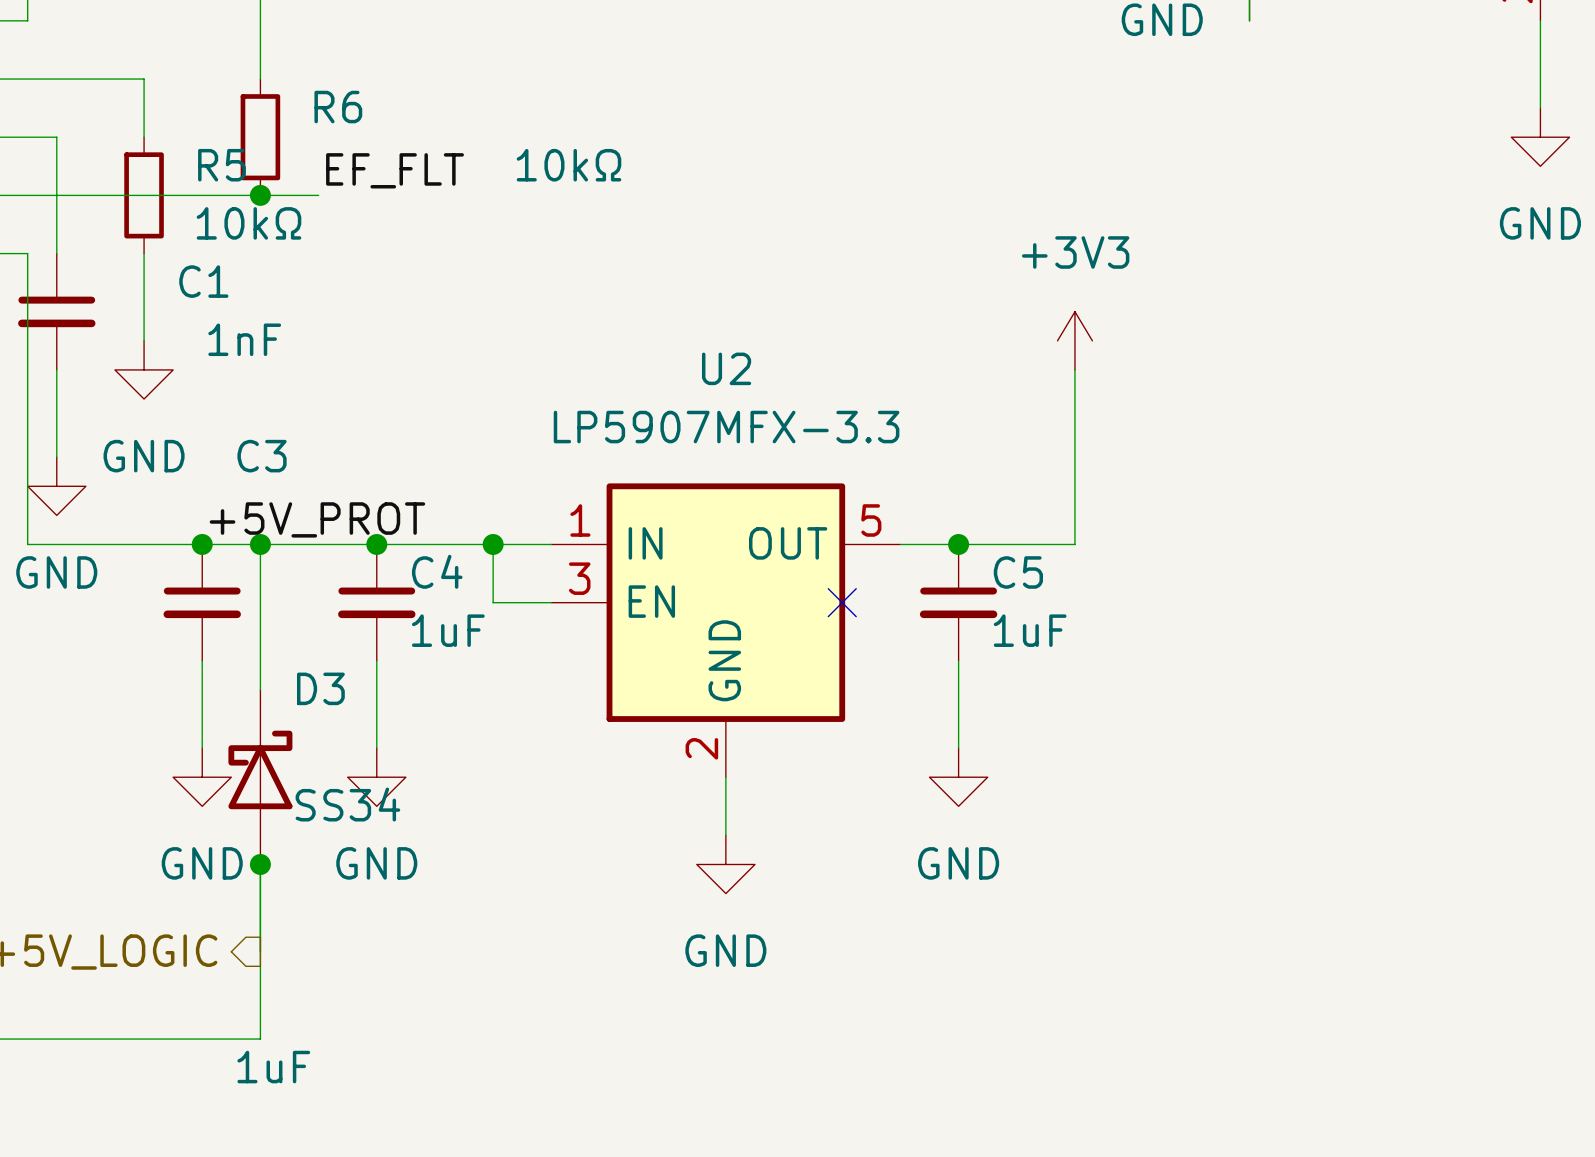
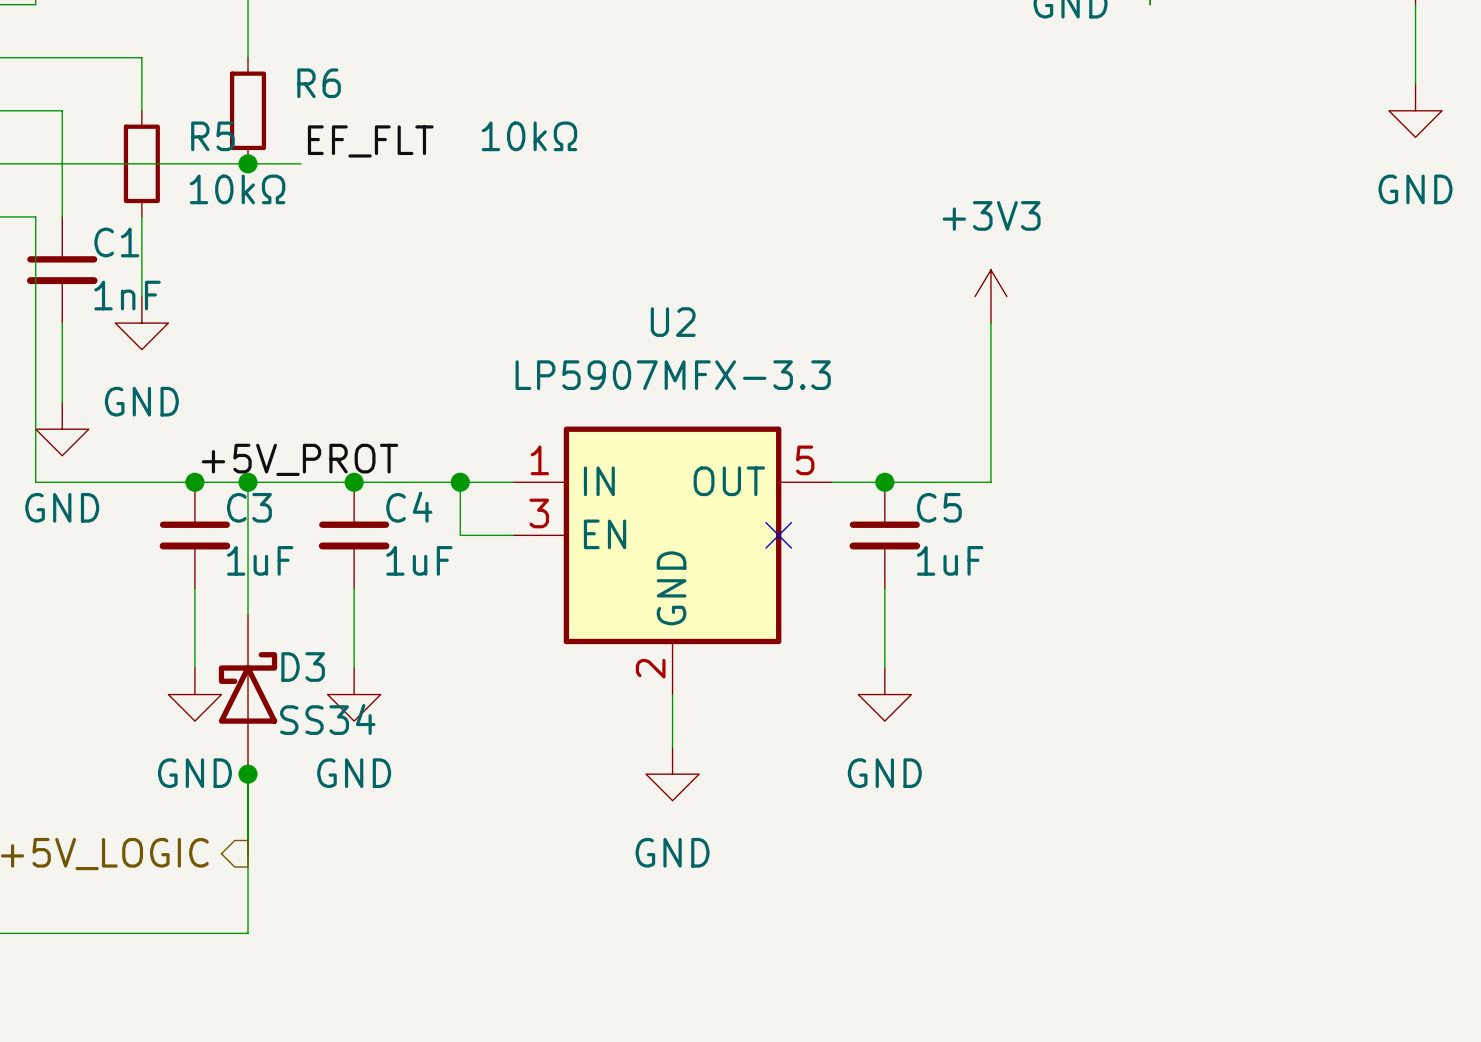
C1 name position: C1 (203, 281) -> C1 (116, 242)
C1 value position: 1nF (244, 339) -> 1nF (127, 295)
C3 name position: C3 (262, 456) -> C3 (249, 507)
D3 name position: D3 (320, 688) -> D3 (303, 667)
C3 value position: 1uF (273, 1067) -> 1uF (260, 560)

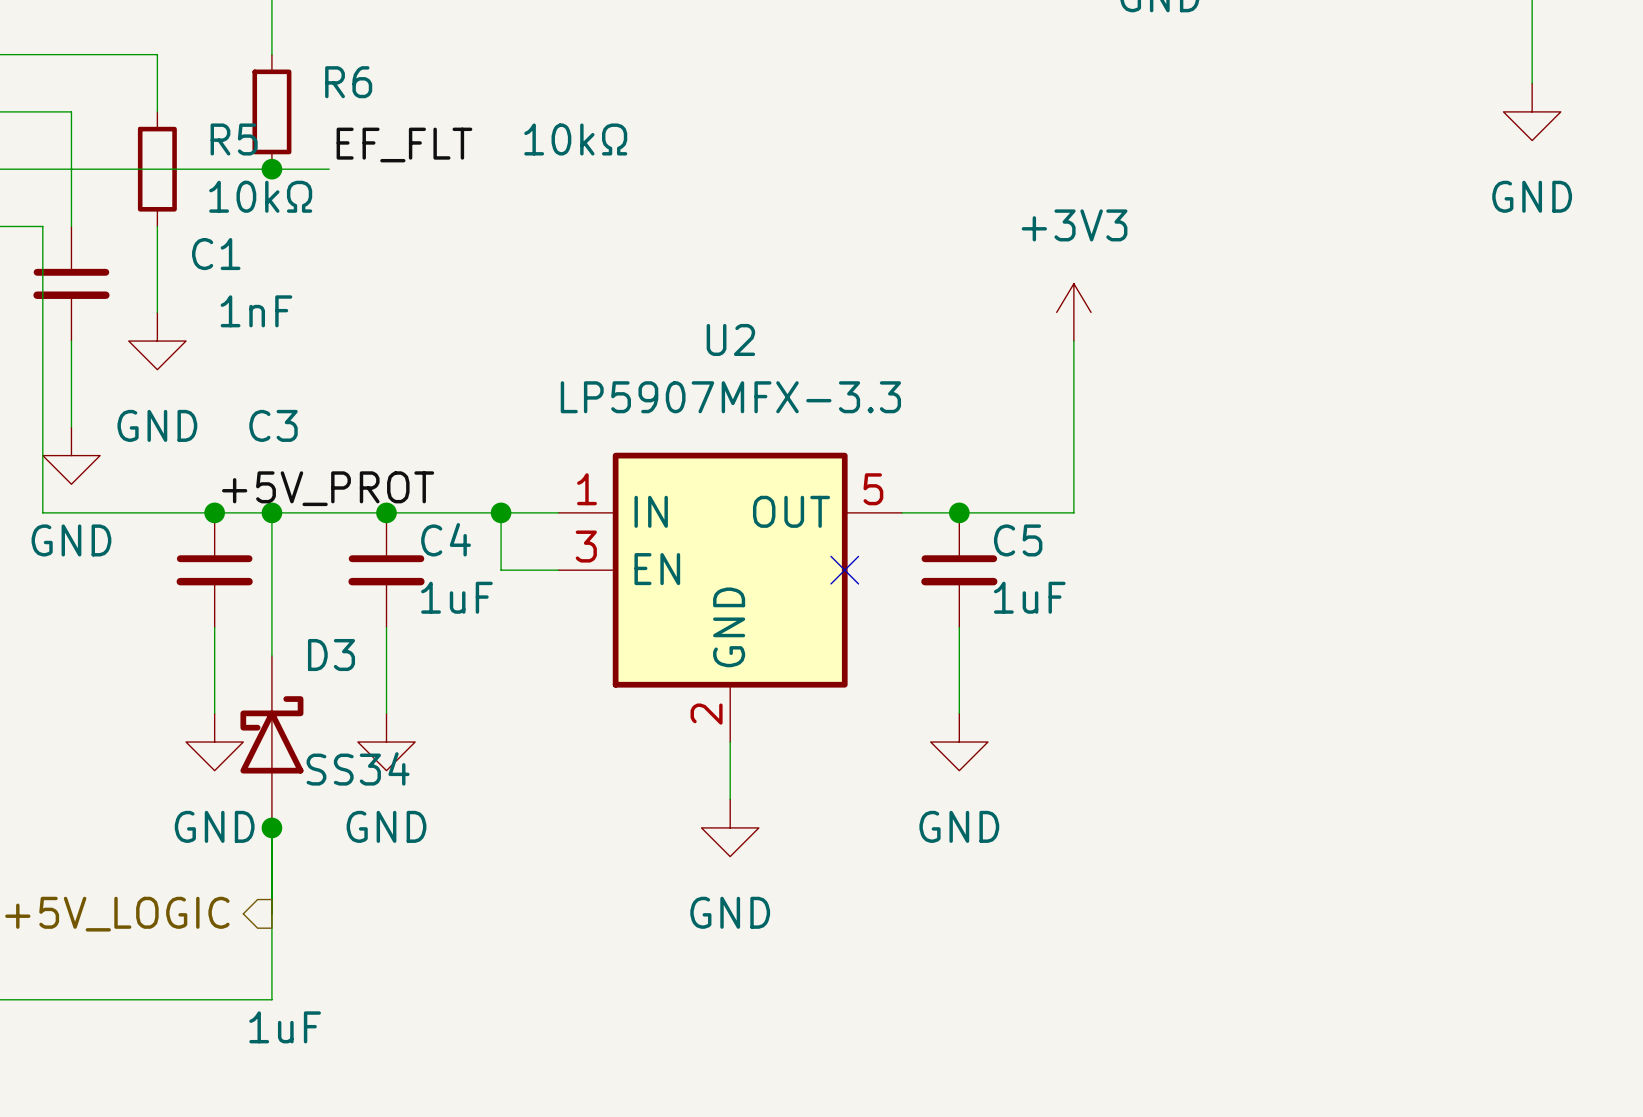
C1 name position: C1 (116, 242) -> C1 (216, 254)
C1 value position: 1nF (127, 295) -> 1nF (256, 311)
C3 name position: C3 (249, 507) -> C3 (273, 425)
C3 value position: 1uF (260, 560) -> 1uF (285, 1027)
D3 name position: D3 (303, 667) -> D3 (331, 655)

